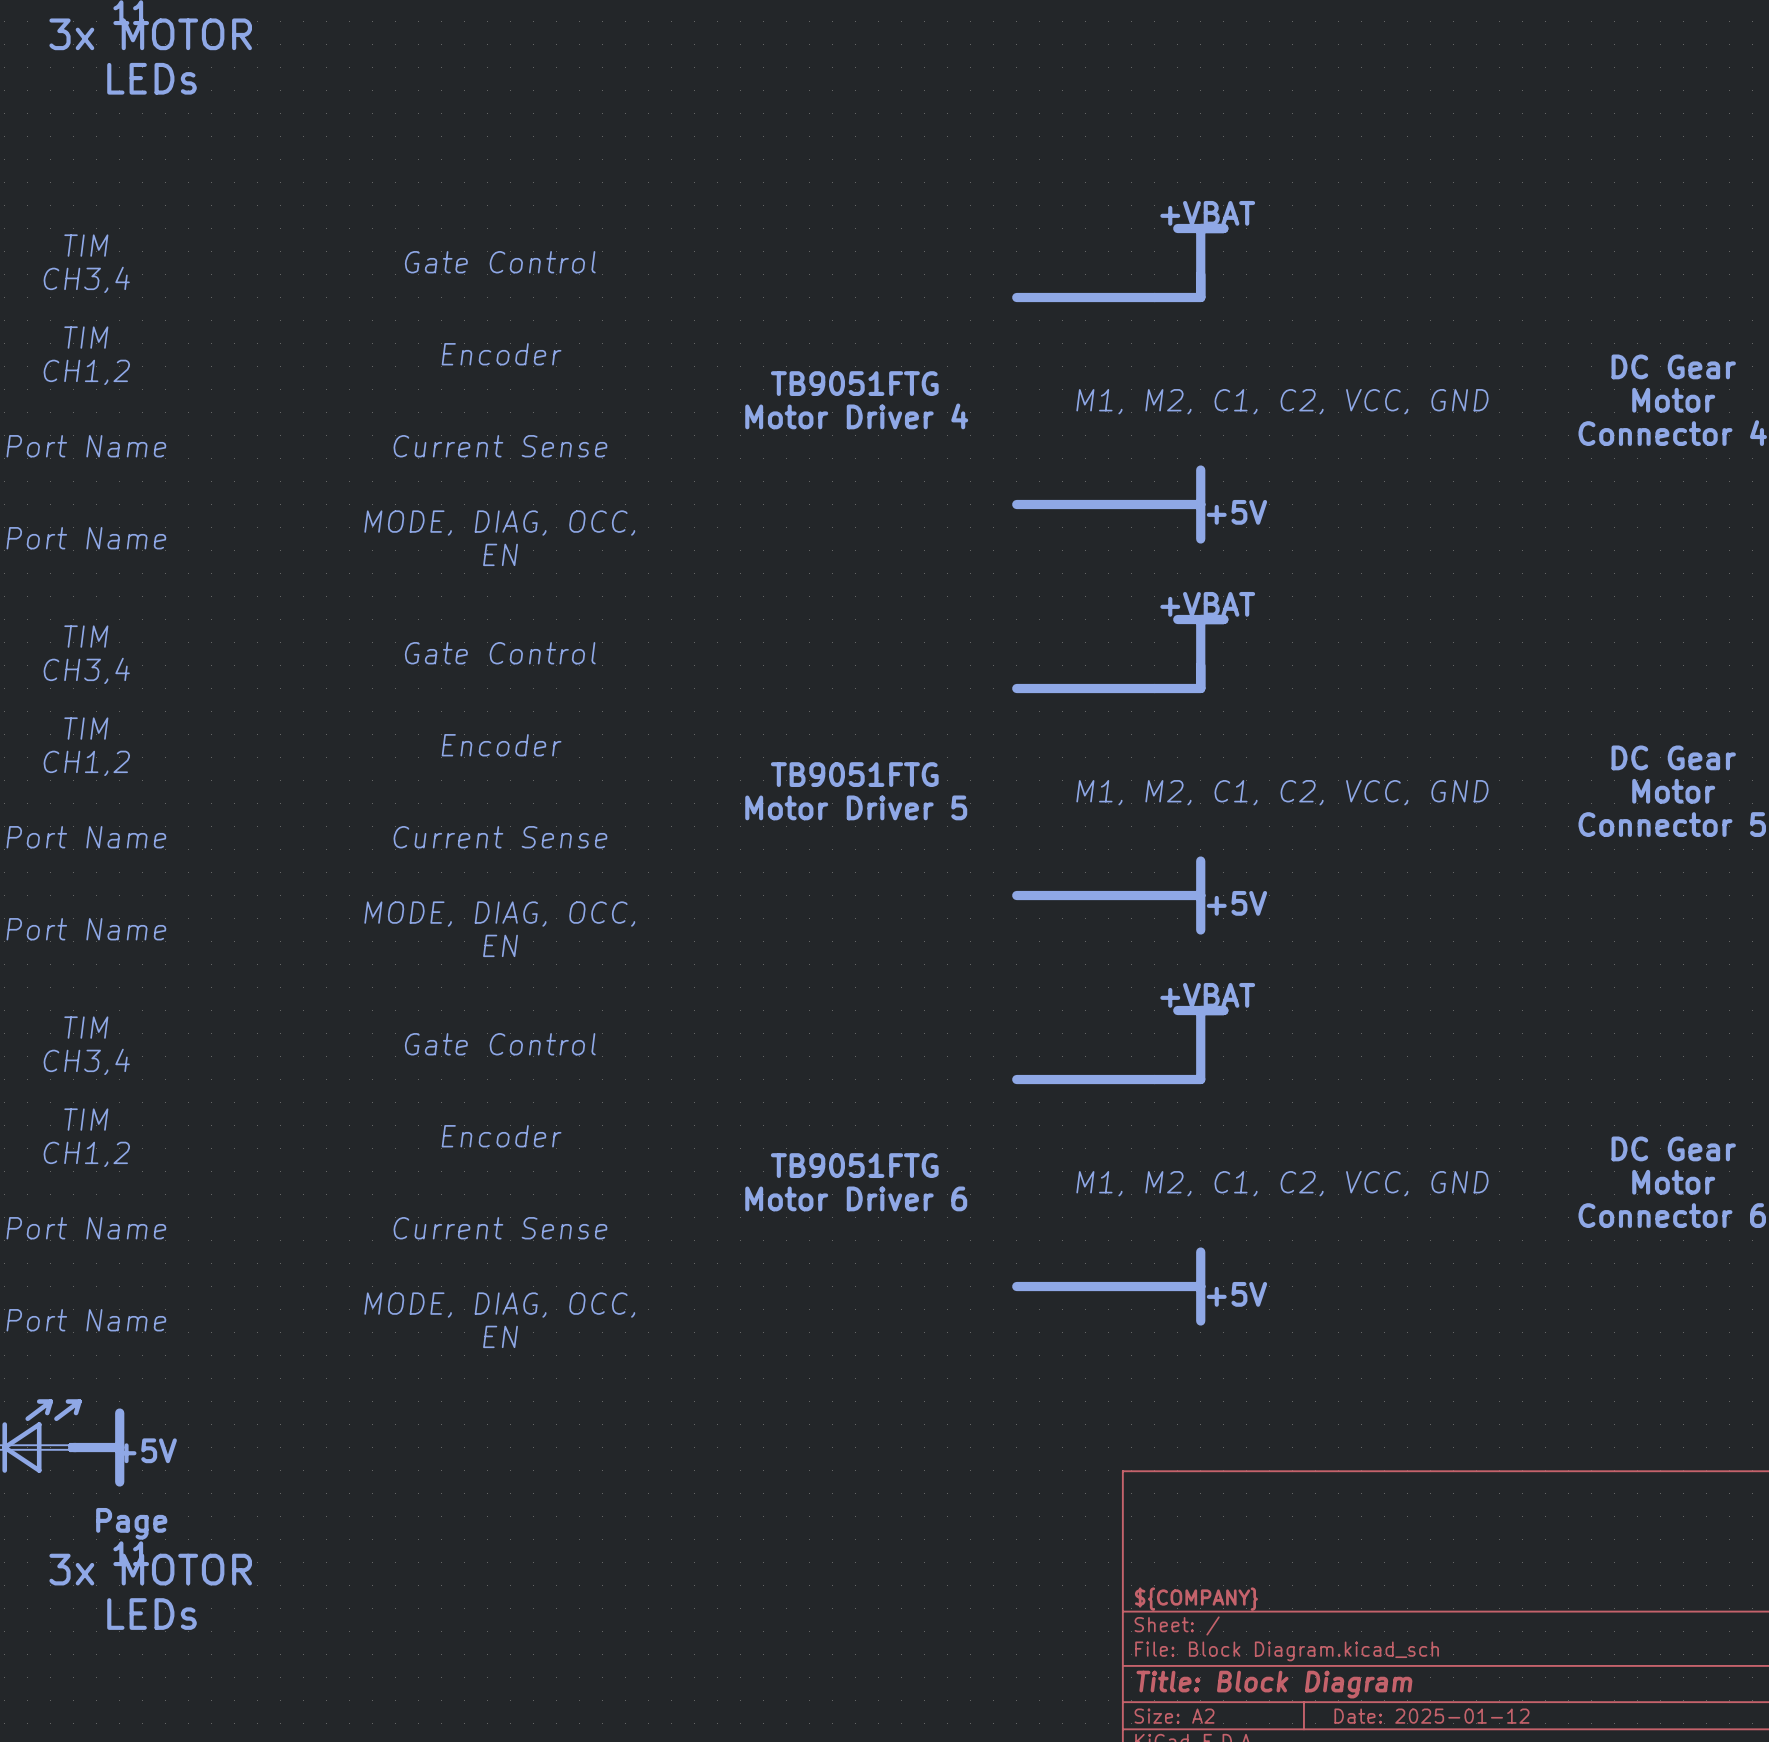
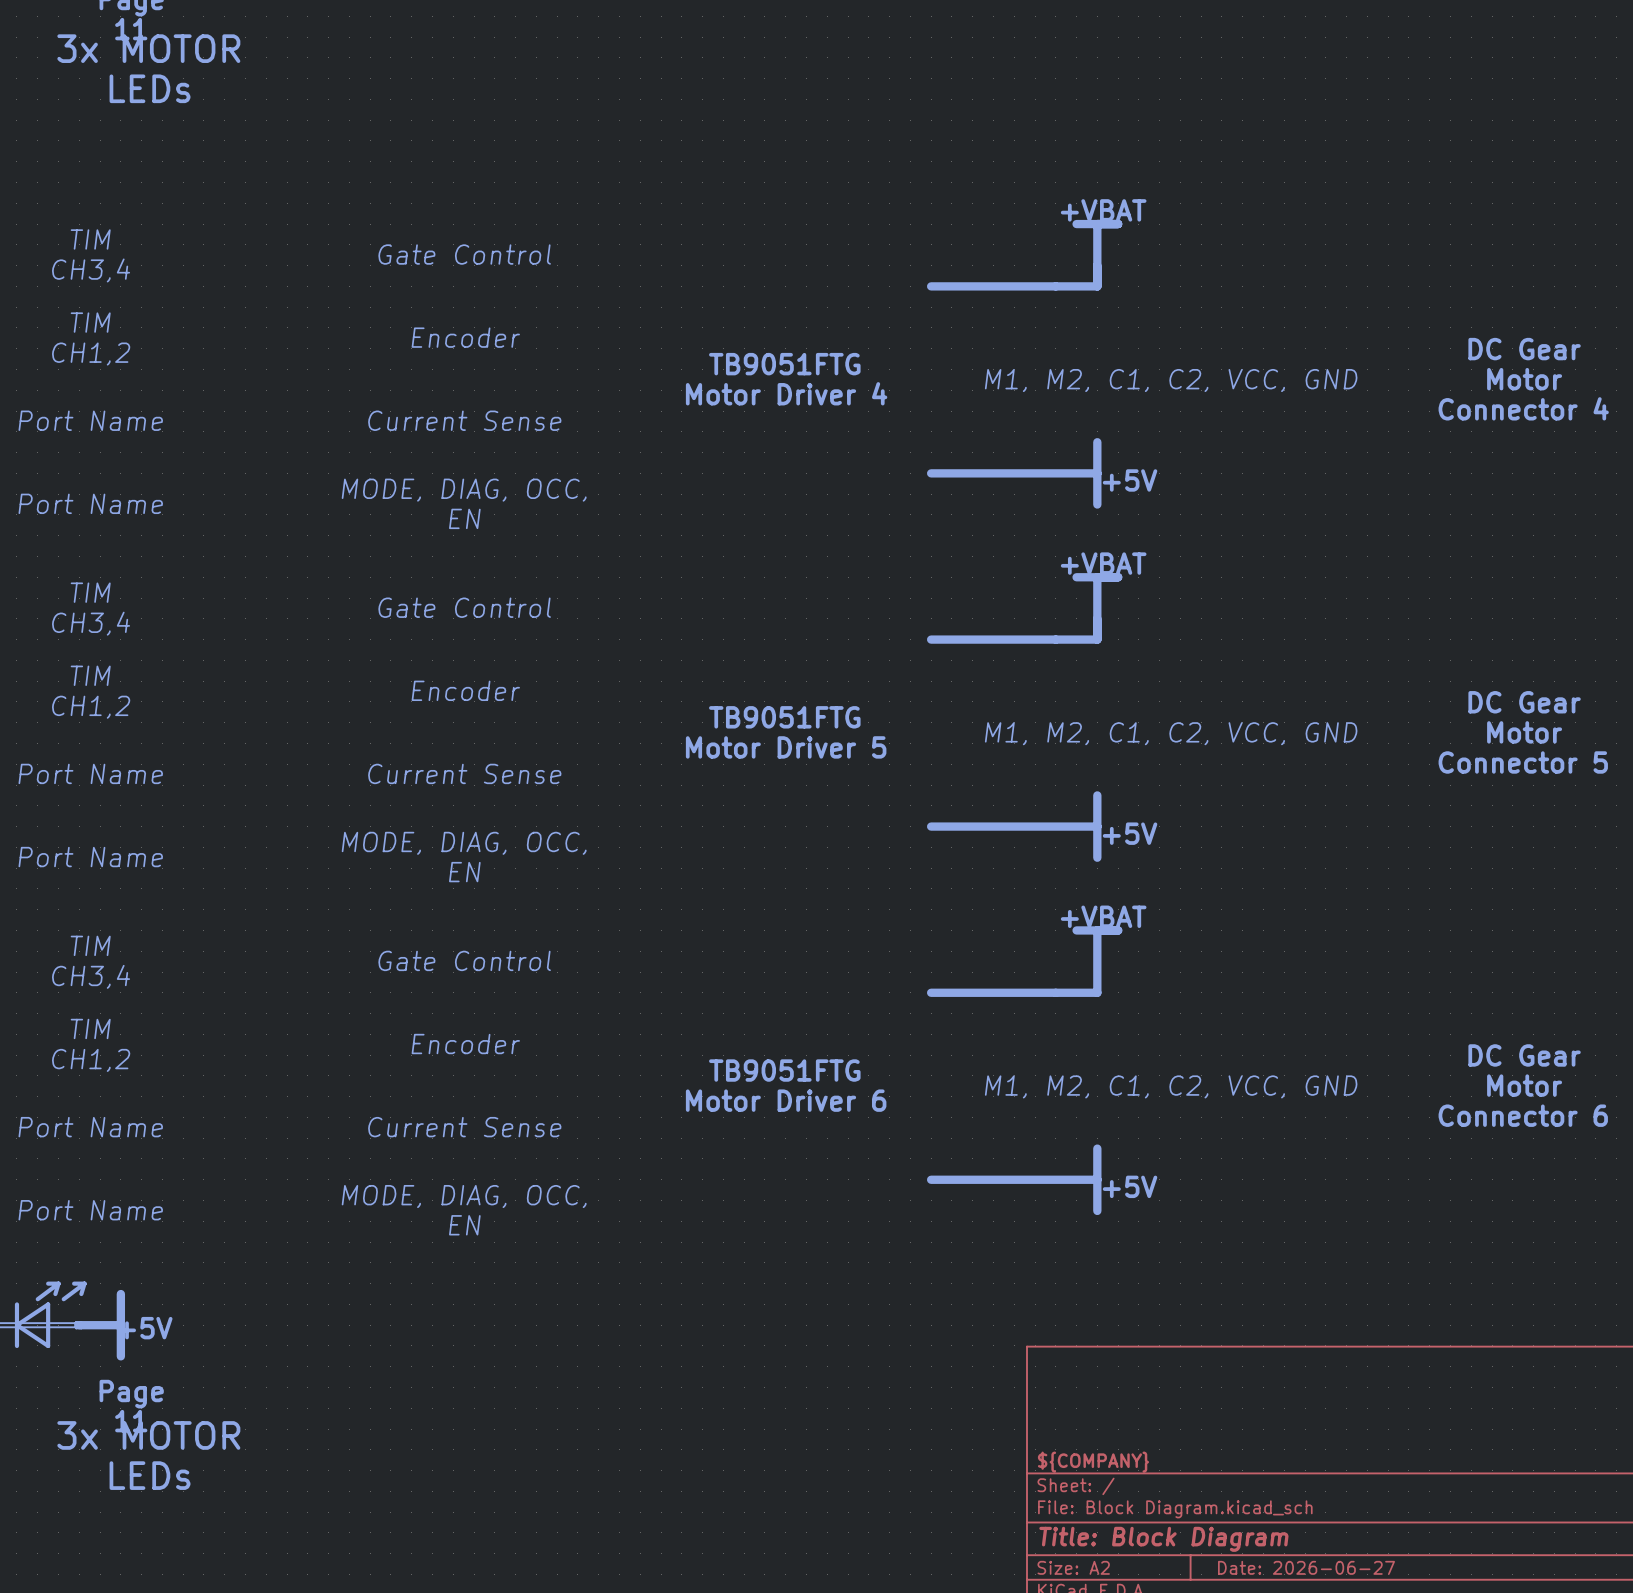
title block: Date: 2025-01-12 (1431, 1716) -> Date: 2026-06-27 (1306, 1567)

